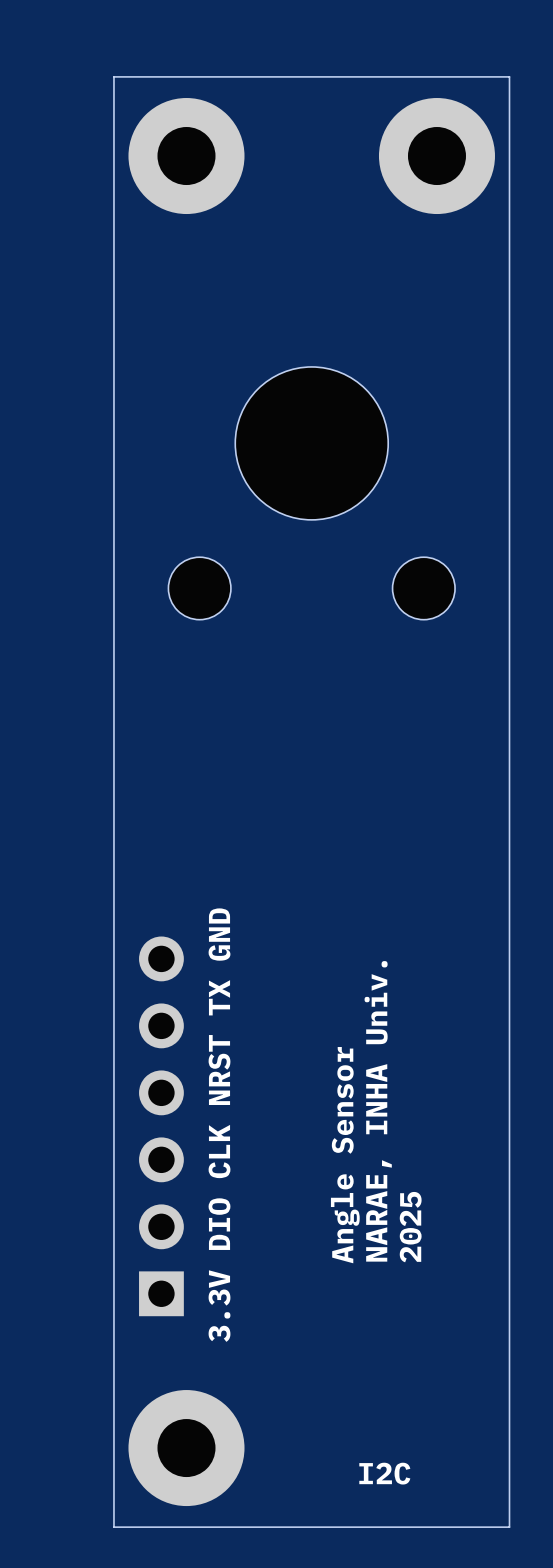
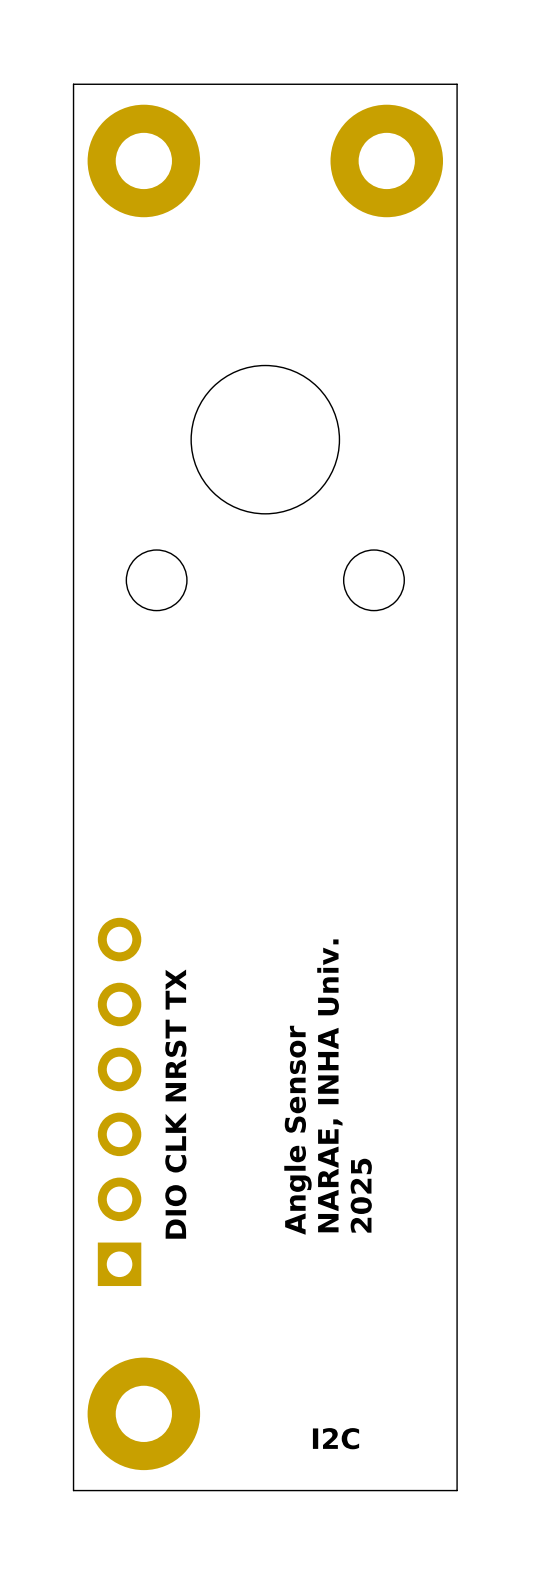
text: 3.3V DIO CLK NRST TX GND (219, 1125) -> DIO CLK NRST TX (175, 1104)

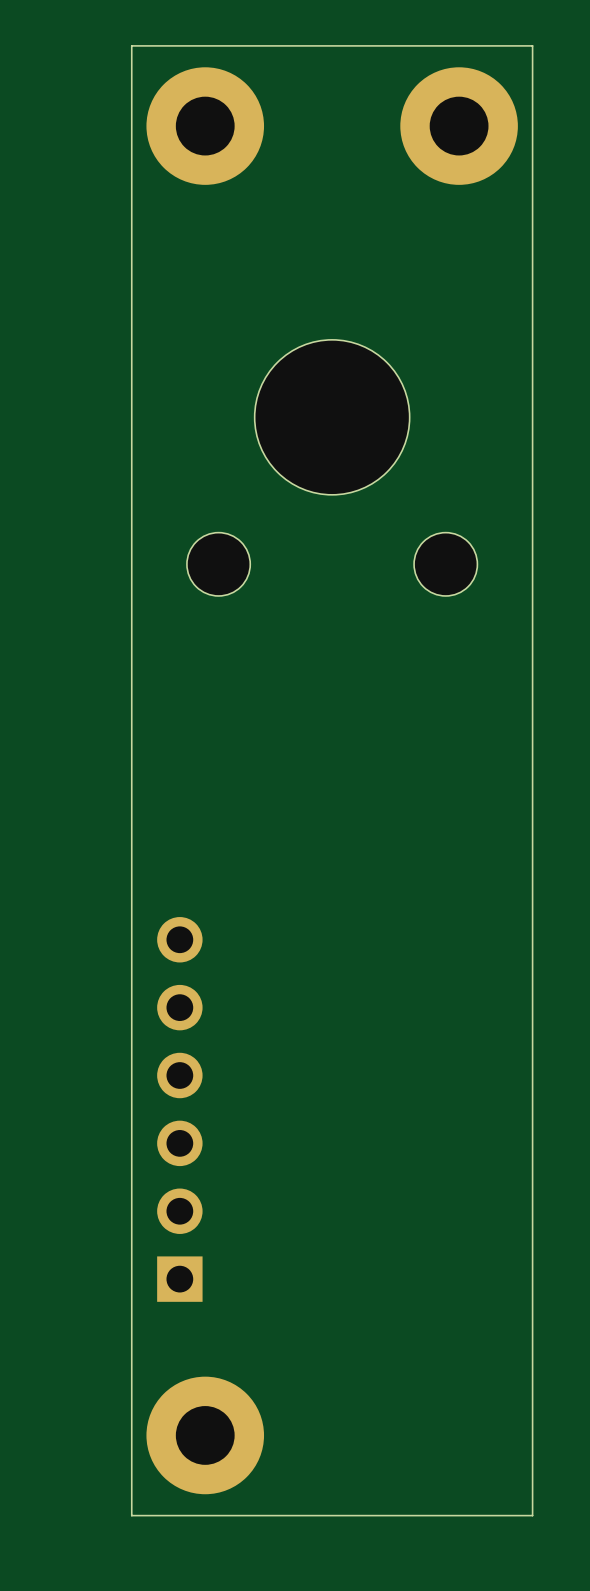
text: NARAE, INHA Univ. (329, 1085) -> none
text: DIO CLK NRST TX (175, 1104) -> none
text: Angle Sensor (297, 1130) -> none
text: 2025 (361, 1195) -> none
text: I2C (336, 1438) -> none

